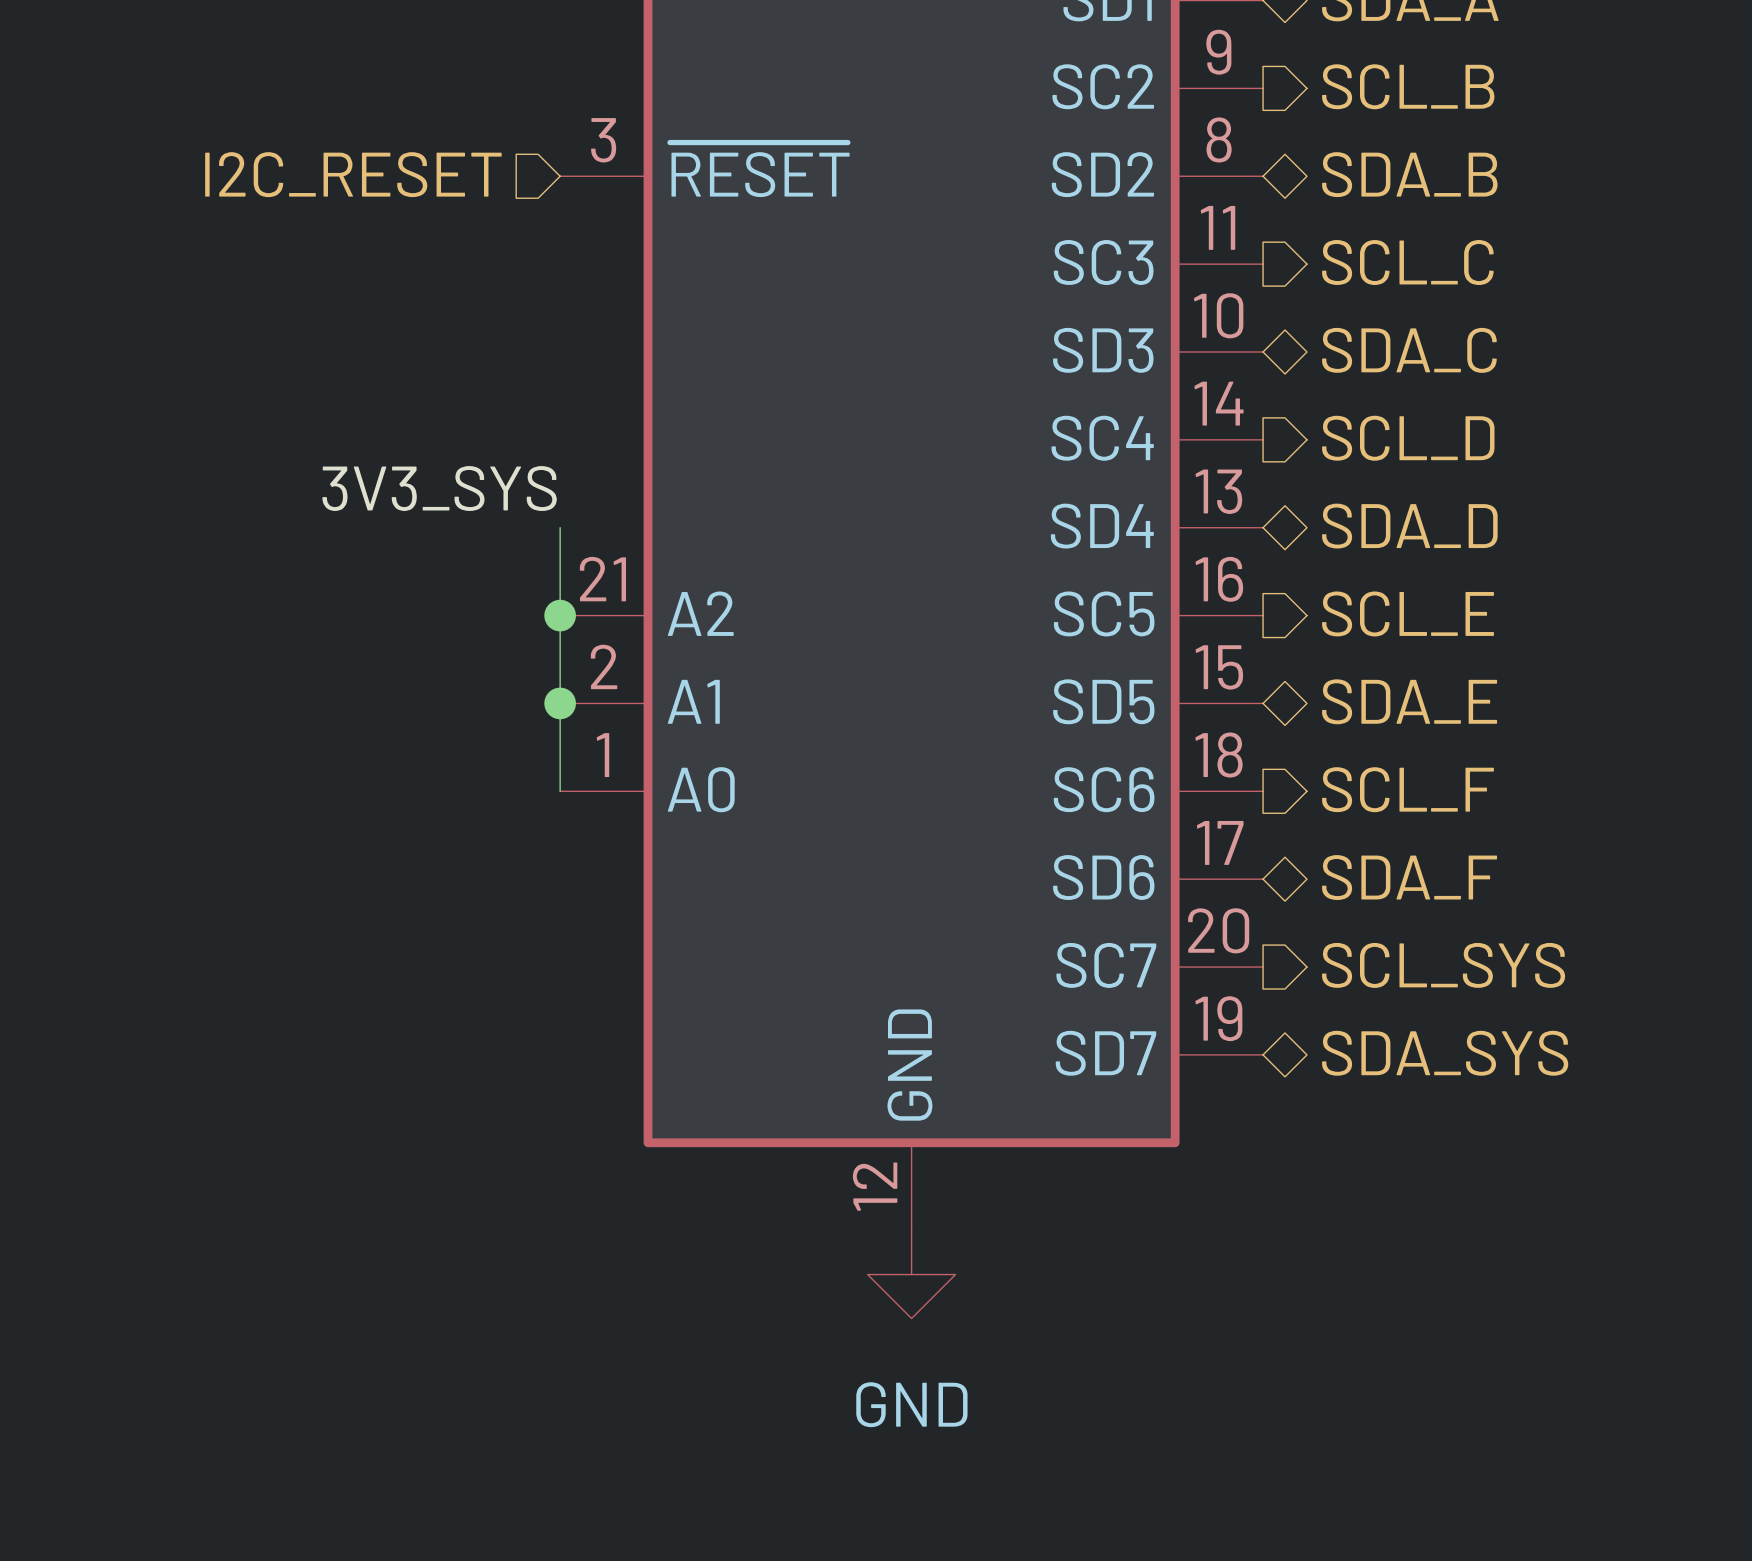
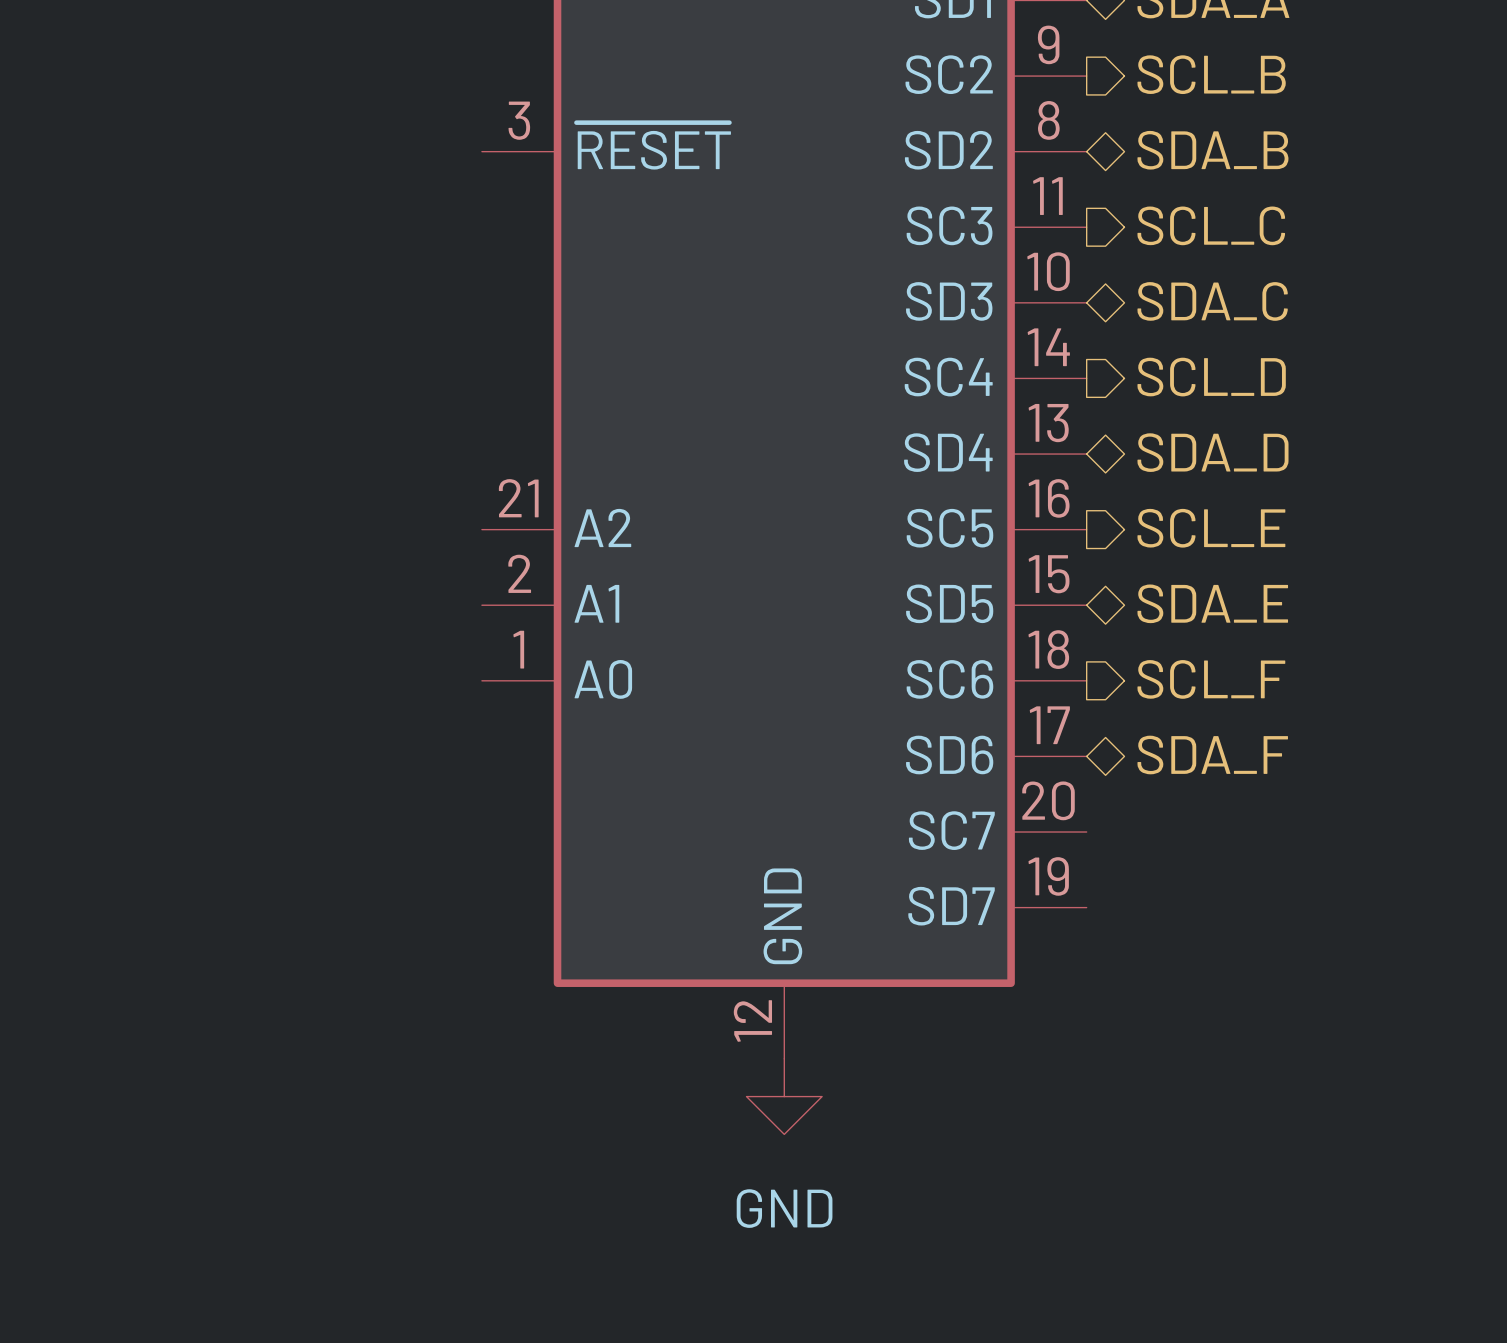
hierarchical label: I2C_RESET (353, 174) -> none
label: 3V3_SYS (439, 488) -> none
wire: (560, 527) (560, 791) -> none
junction: (560, 615) -> none
junction: (560, 703) -> none
hierarchical label: SCL_SYS (1443, 965) -> none
hierarchical label: SDA_SYS (1445, 1053) -> none

